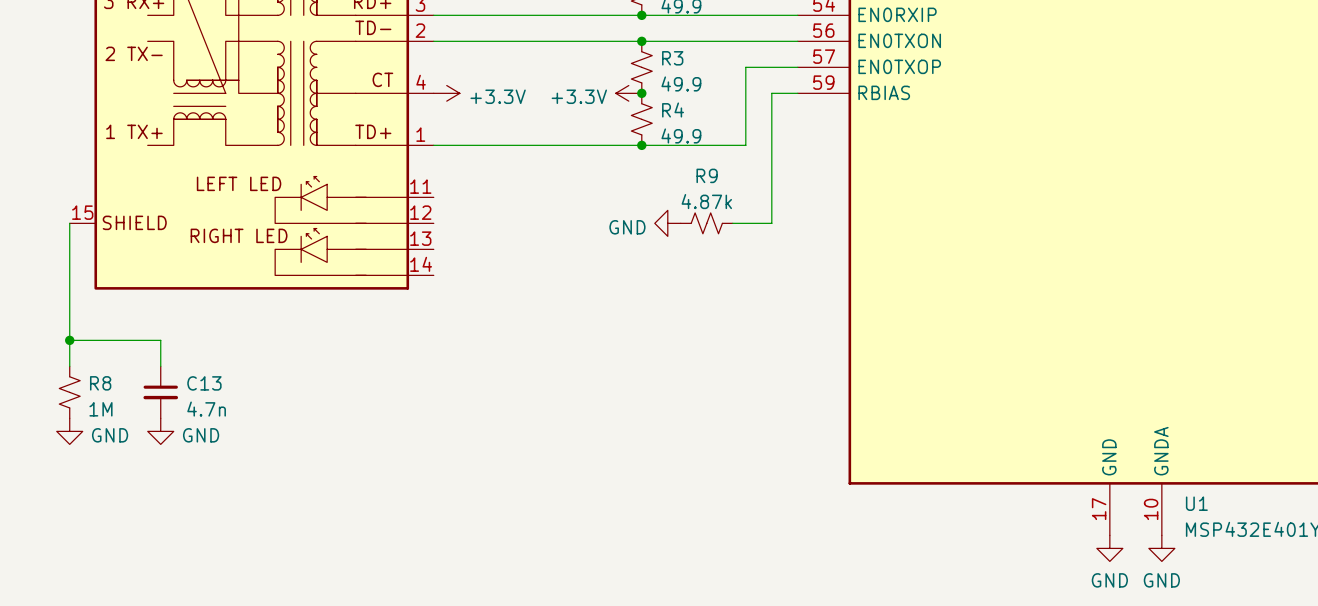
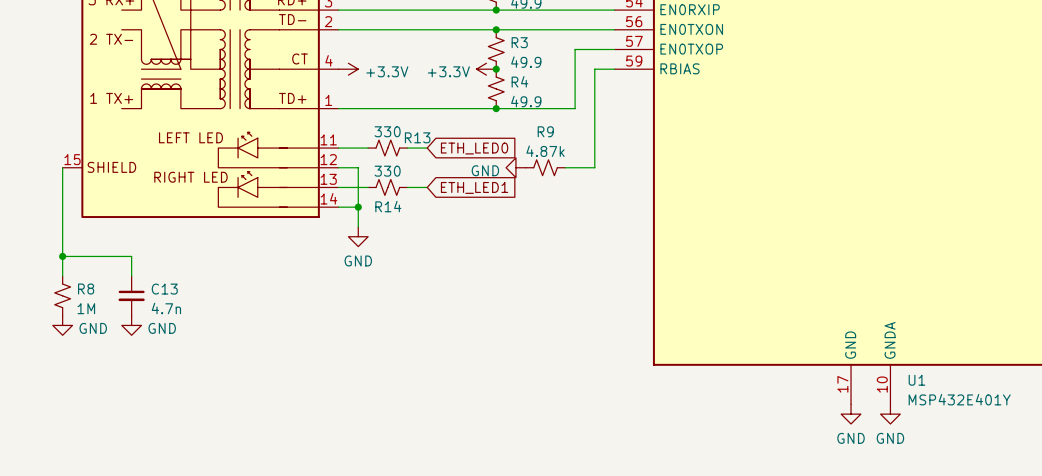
wire: none -> (338, 148) (368, 148)
R13: none -> 330 (387, 148)
wire: none -> (407, 148) (427, 148)
global label: none -> ETH_LED0 (474, 148)
wire: none -> (338, 167) (358, 167) (358, 226)
wire: none -> (338, 187) (368, 187)
R14: none -> 330 (387, 187)
wire: none -> (407, 187) (427, 187)
global label: none -> ETH_LED1 (474, 187)
wire: none -> (338, 207) (358, 207)
junction: none -> (358, 207)
power symbol: none -> GND (358, 236)

